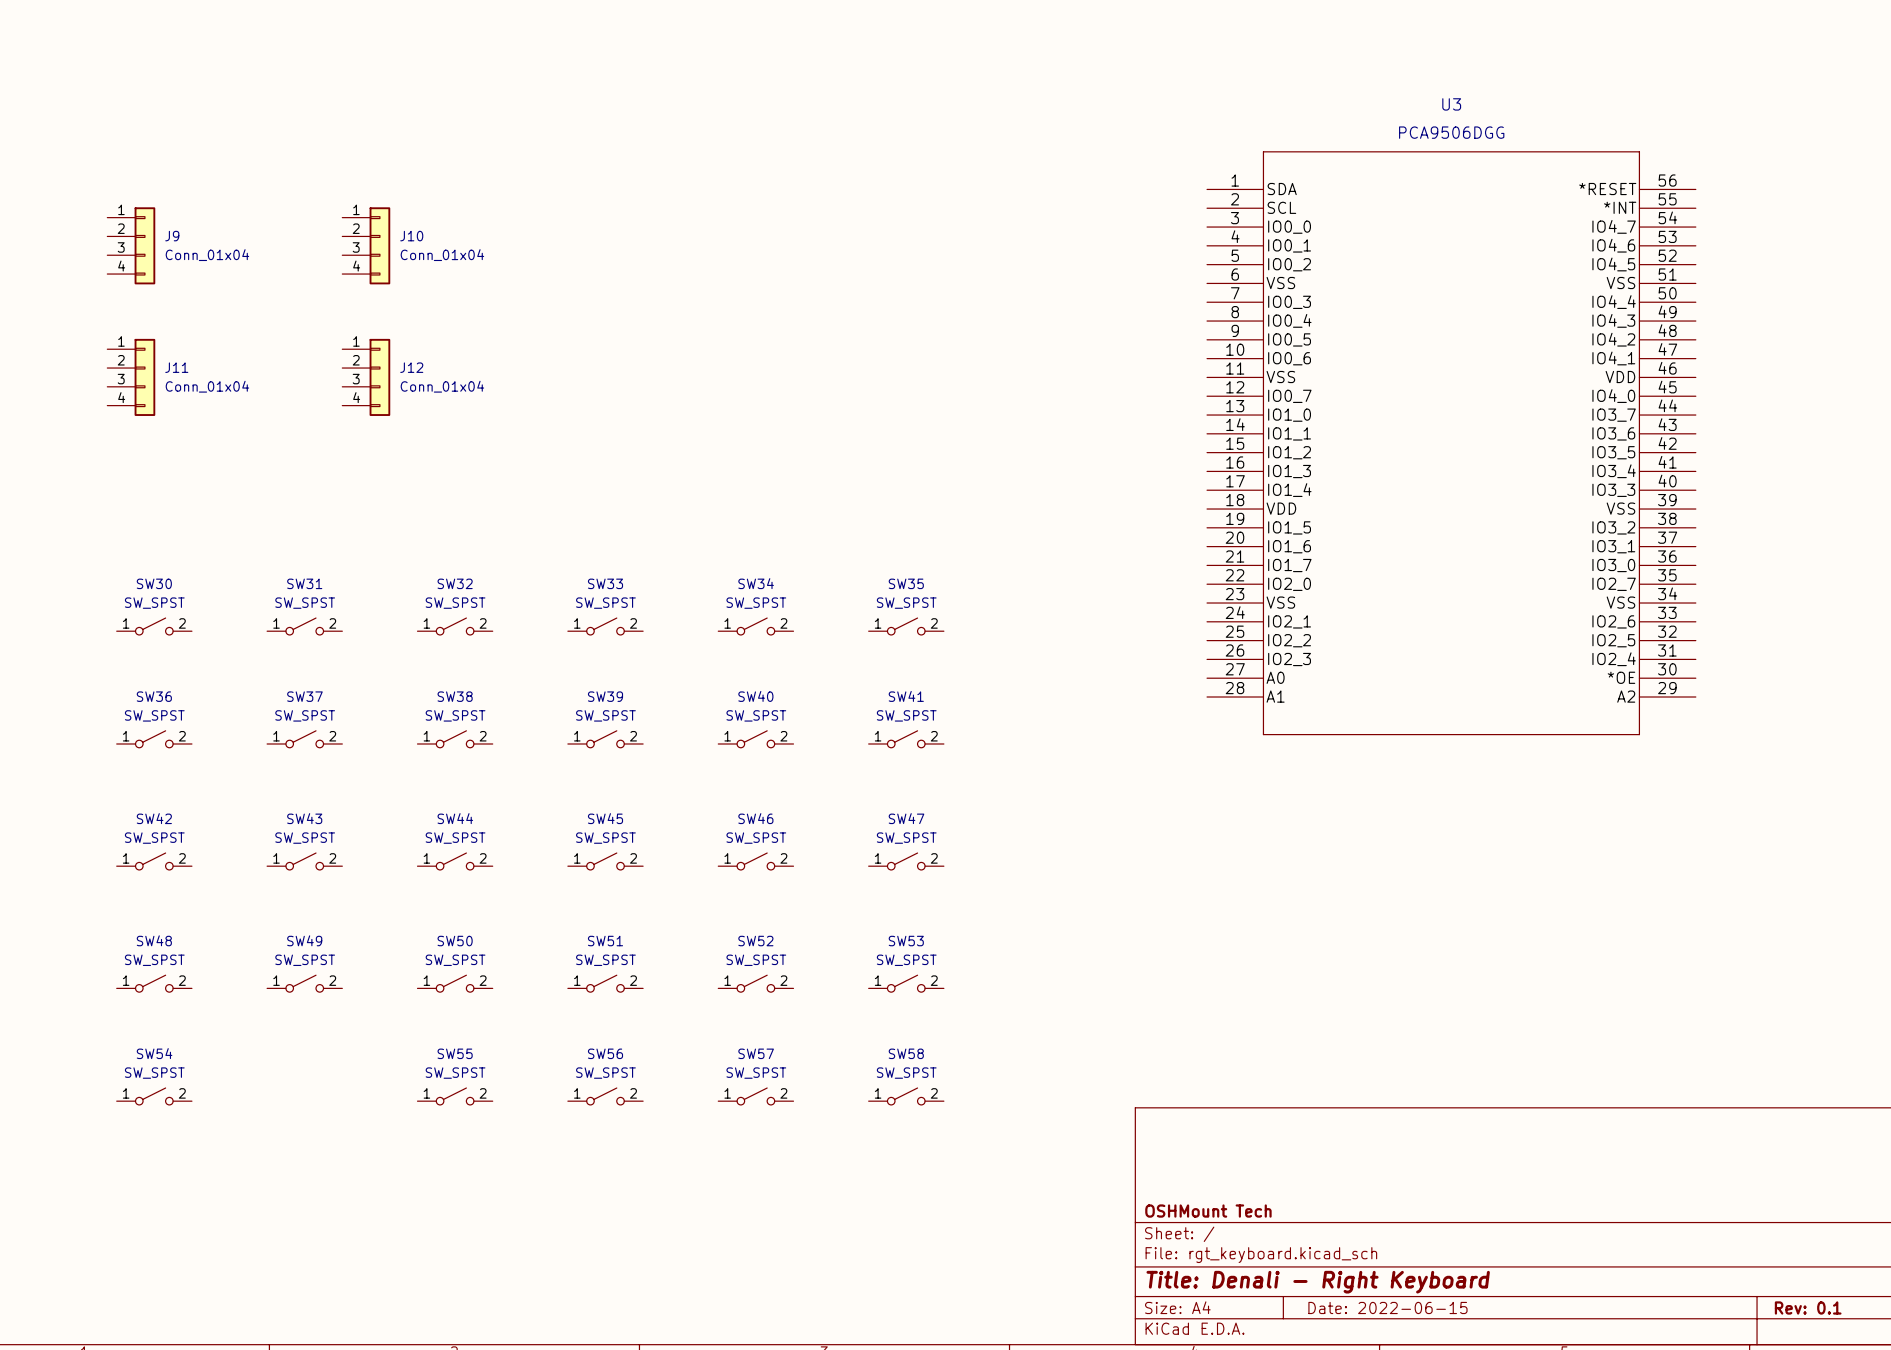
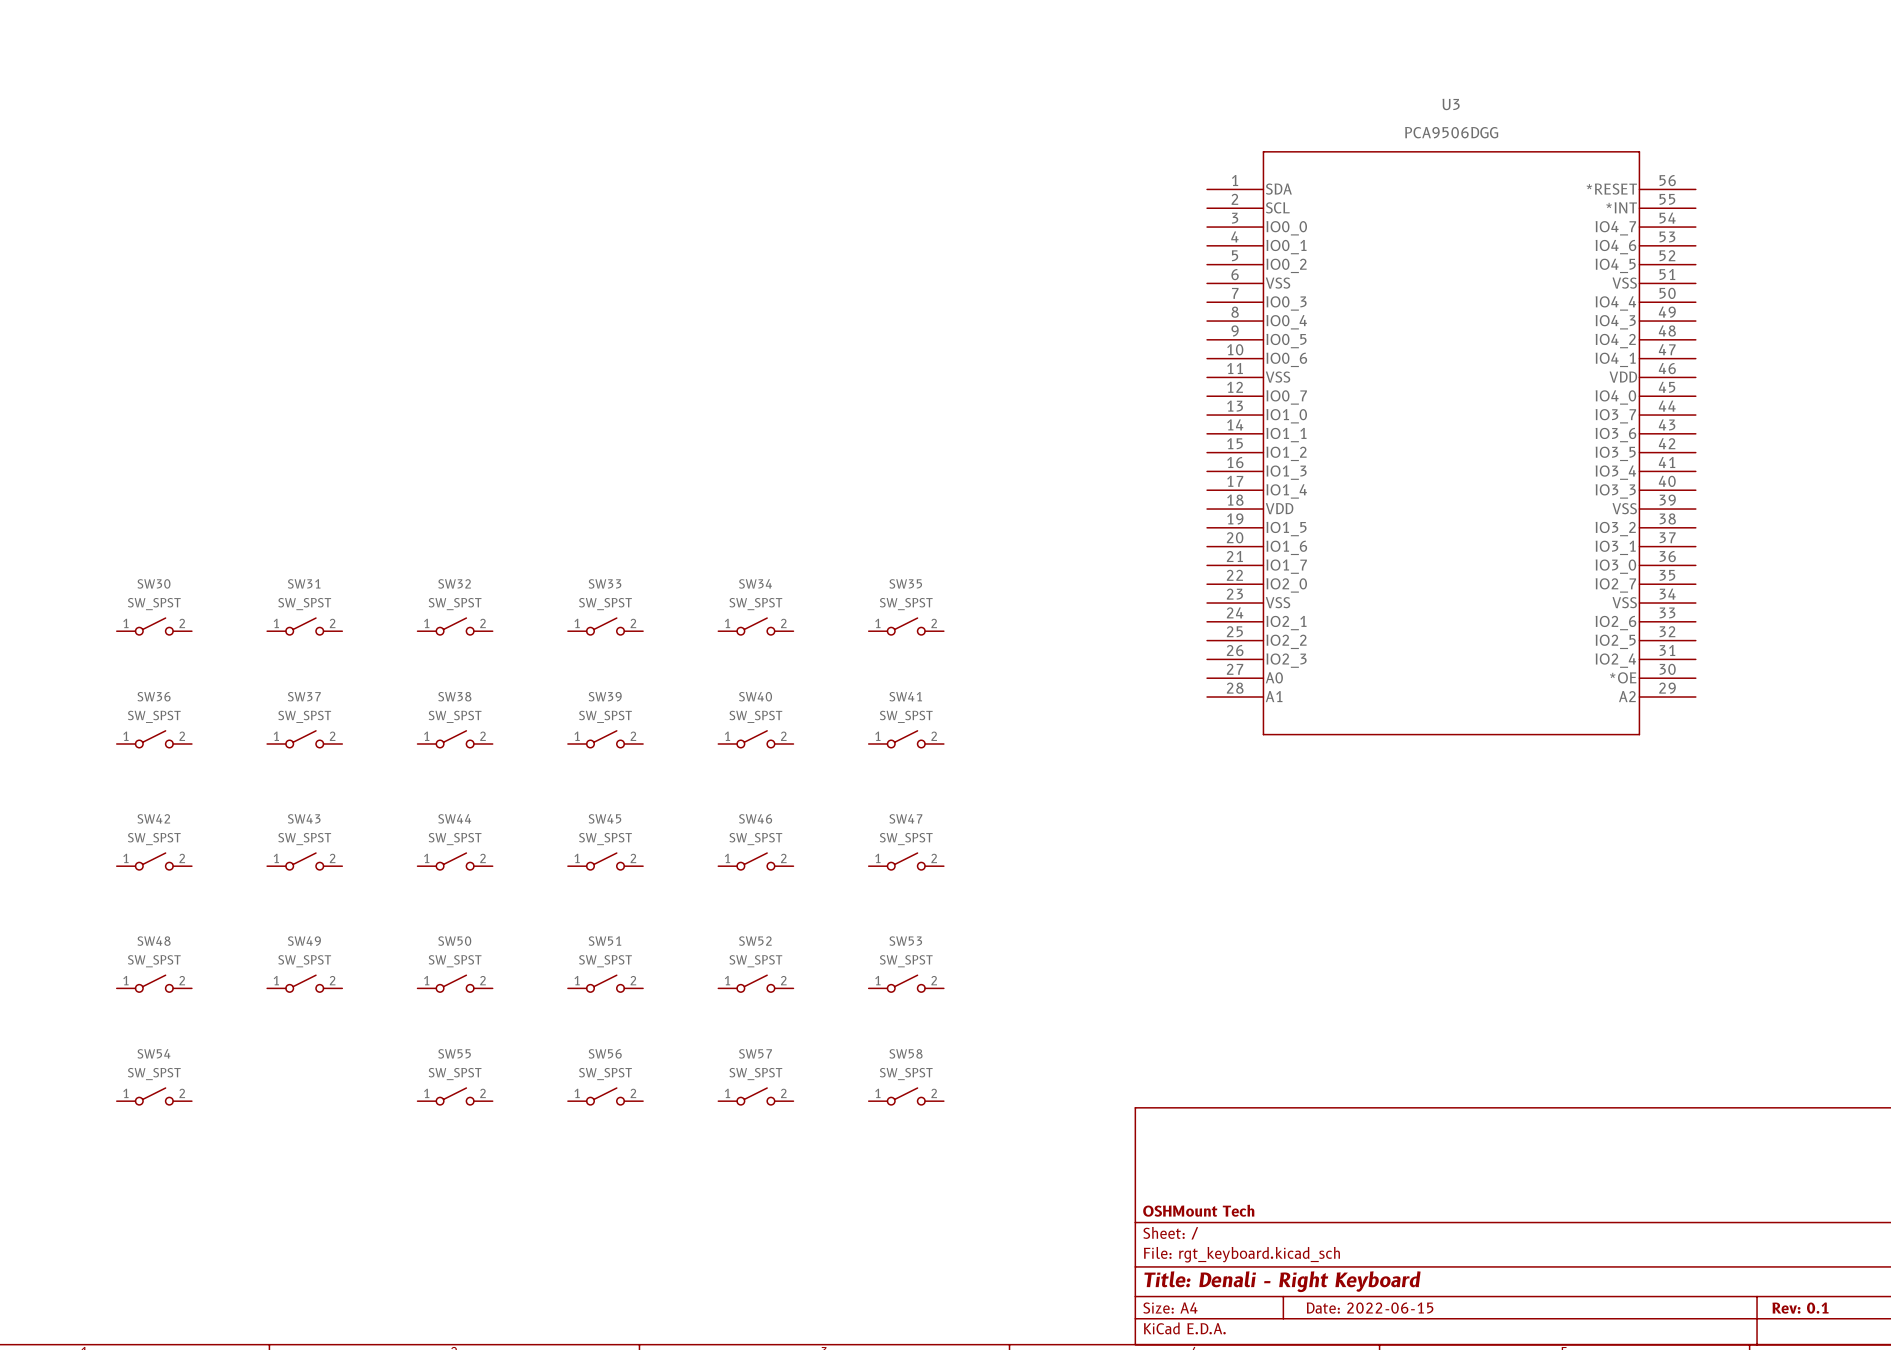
J9: Conn_01x04 (131, 245) -> none
J10: Conn_01x04 (366, 245) -> none
J11: Conn_01x04 (131, 377) -> none
J12: Conn_01x04 (366, 377) -> none

